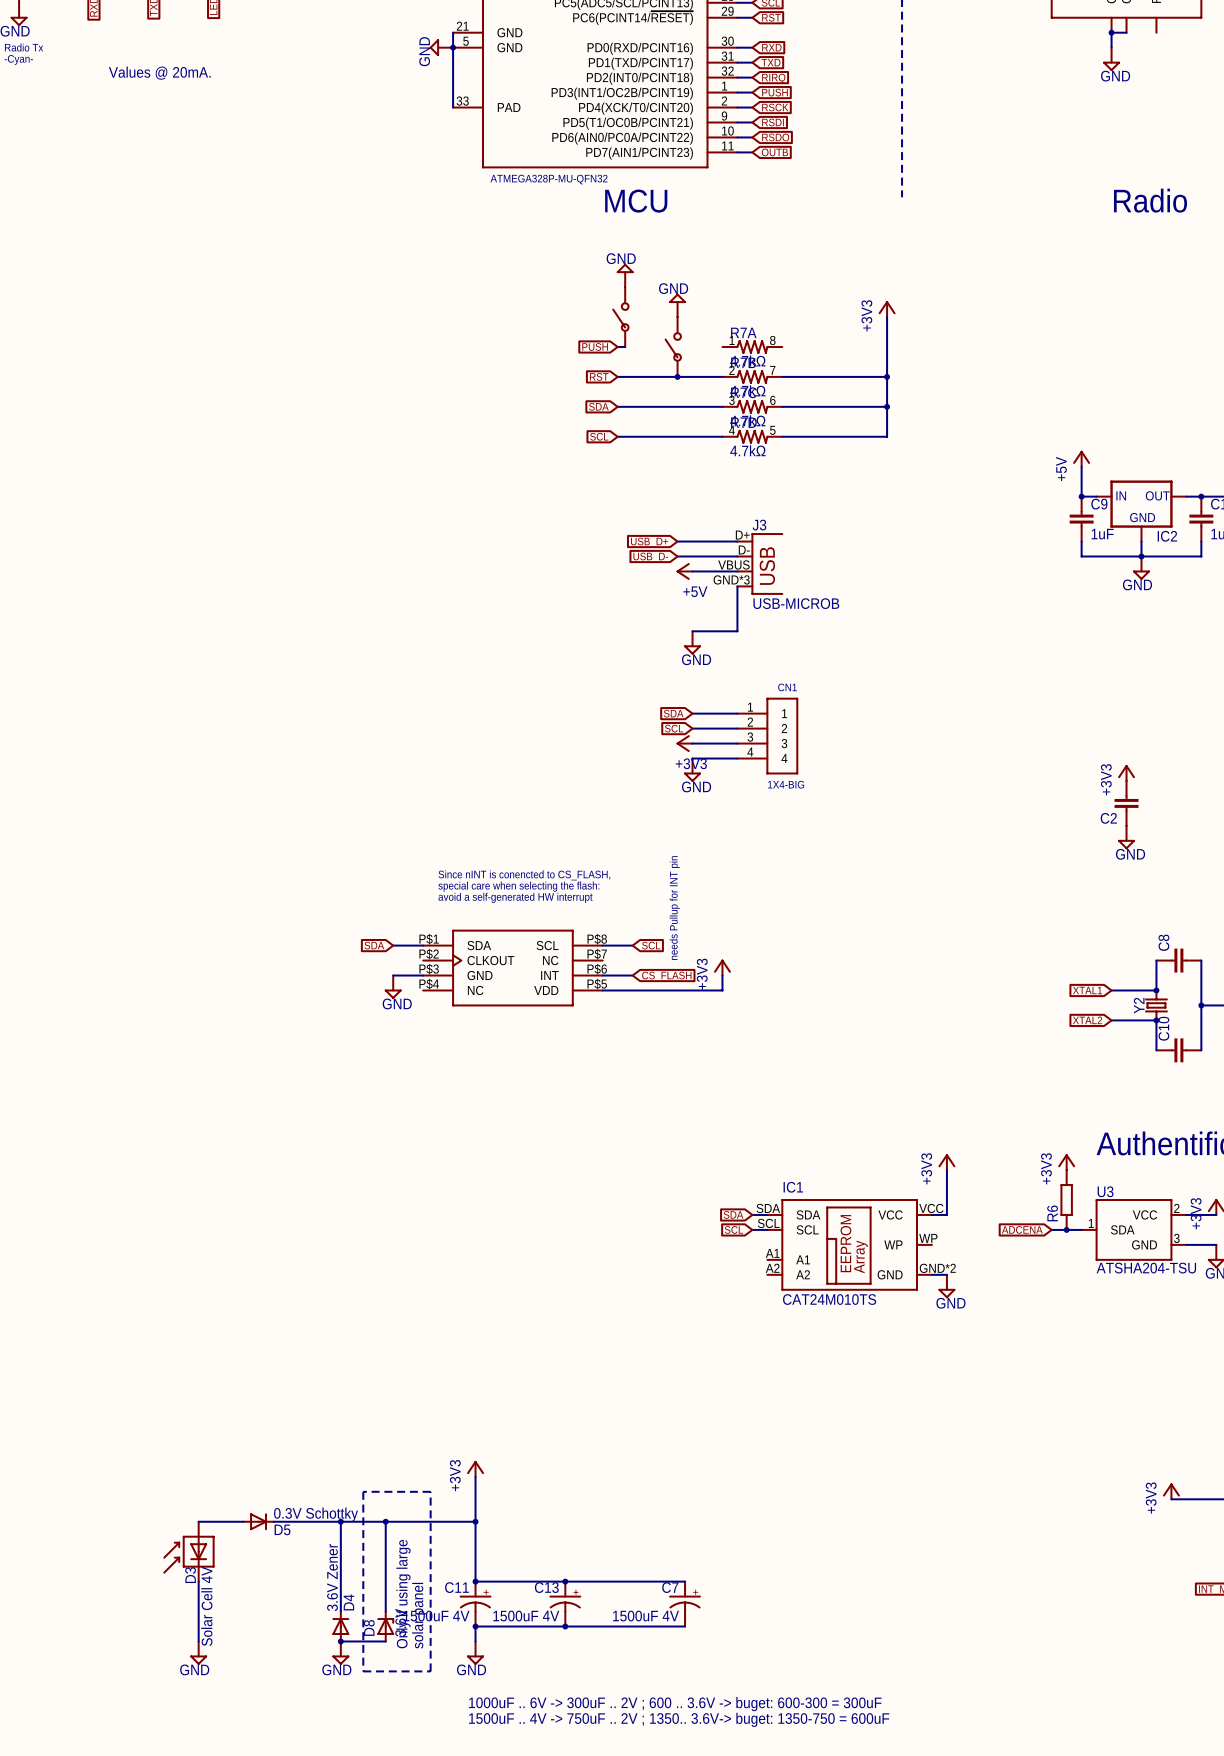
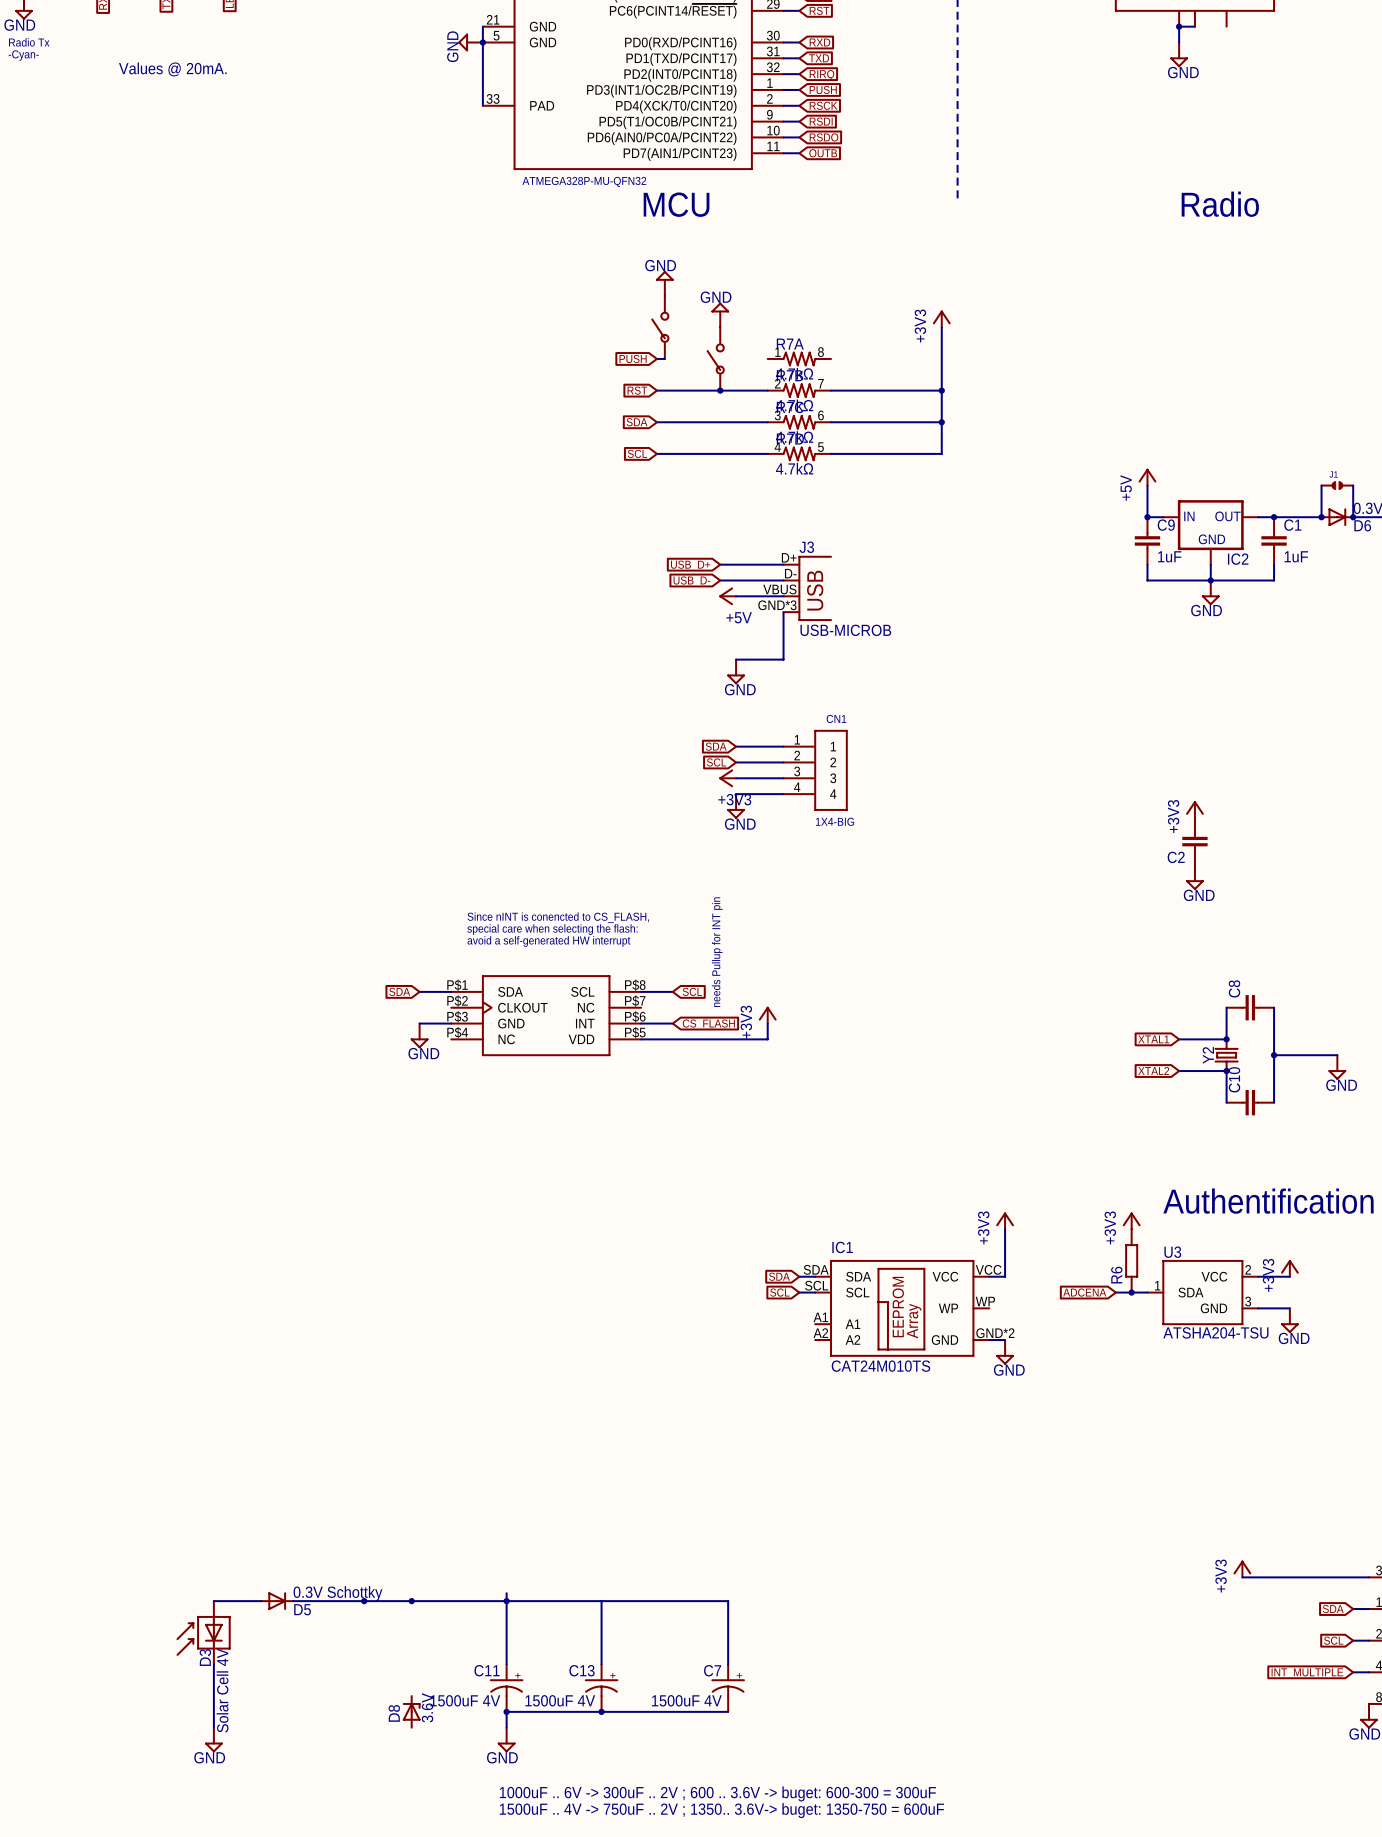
power symbol: +3V3 (475, 1469) -> none
wire: (475, 1476) (475, 1514) -> none
wire: (363, 1491) (363, 1671) (430, 1671) (430, 1491) (363, 1491) -> none
wire: (340, 1521) (340, 1611) -> none
wire: (385, 1521) (385, 1611) -> none
wire: none -> (601, 1601) (601, 1664)
wire: (475, 1581) (685, 1581) -> (506, 1601) (728, 1601) (728, 1664)
junction: (475, 1581) -> none
junction: (565, 1581) -> none
text: Only if using large (403, 1594) -> none
text: solar panel (419, 1615) -> none
D4: 3.6V Zener (340, 1626) -> none
wire: (340, 1641) (385, 1641) -> none
junction: (340, 1641) -> none
power symbol: GND (340, 1653) -> none

